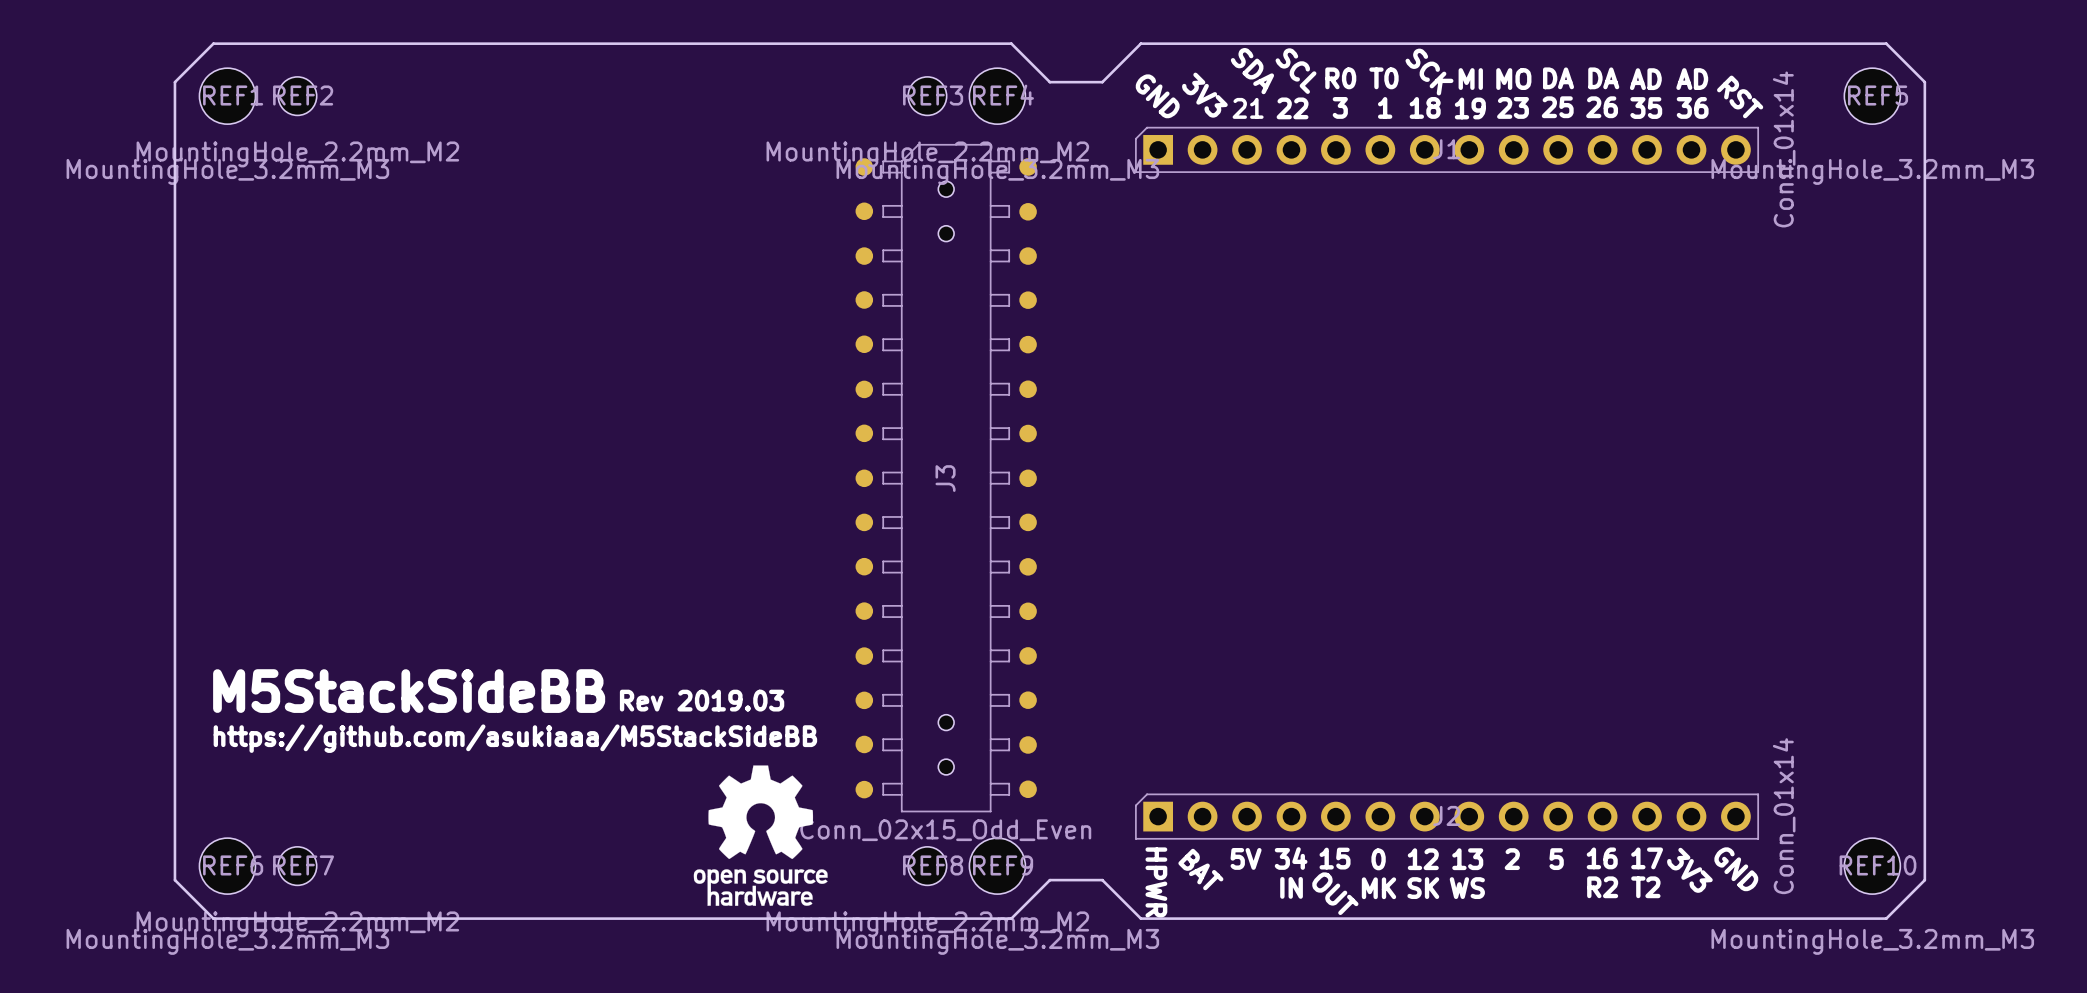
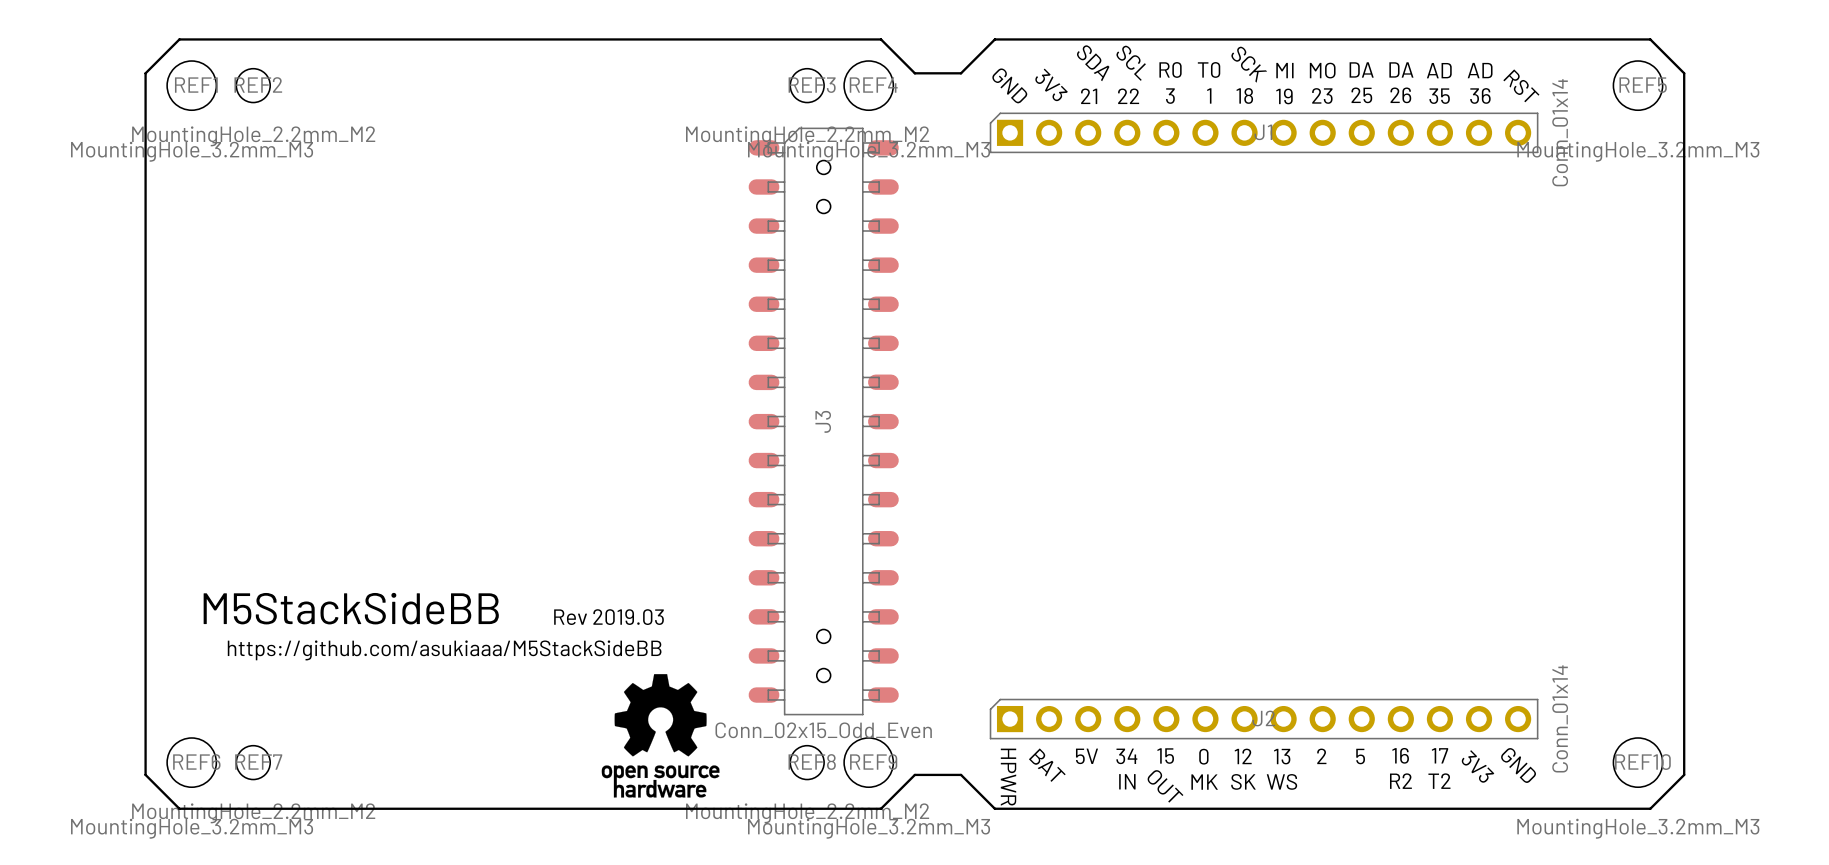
J3 footprint: [855, 143, 1037, 813] -> [748, 127, 899, 716]

